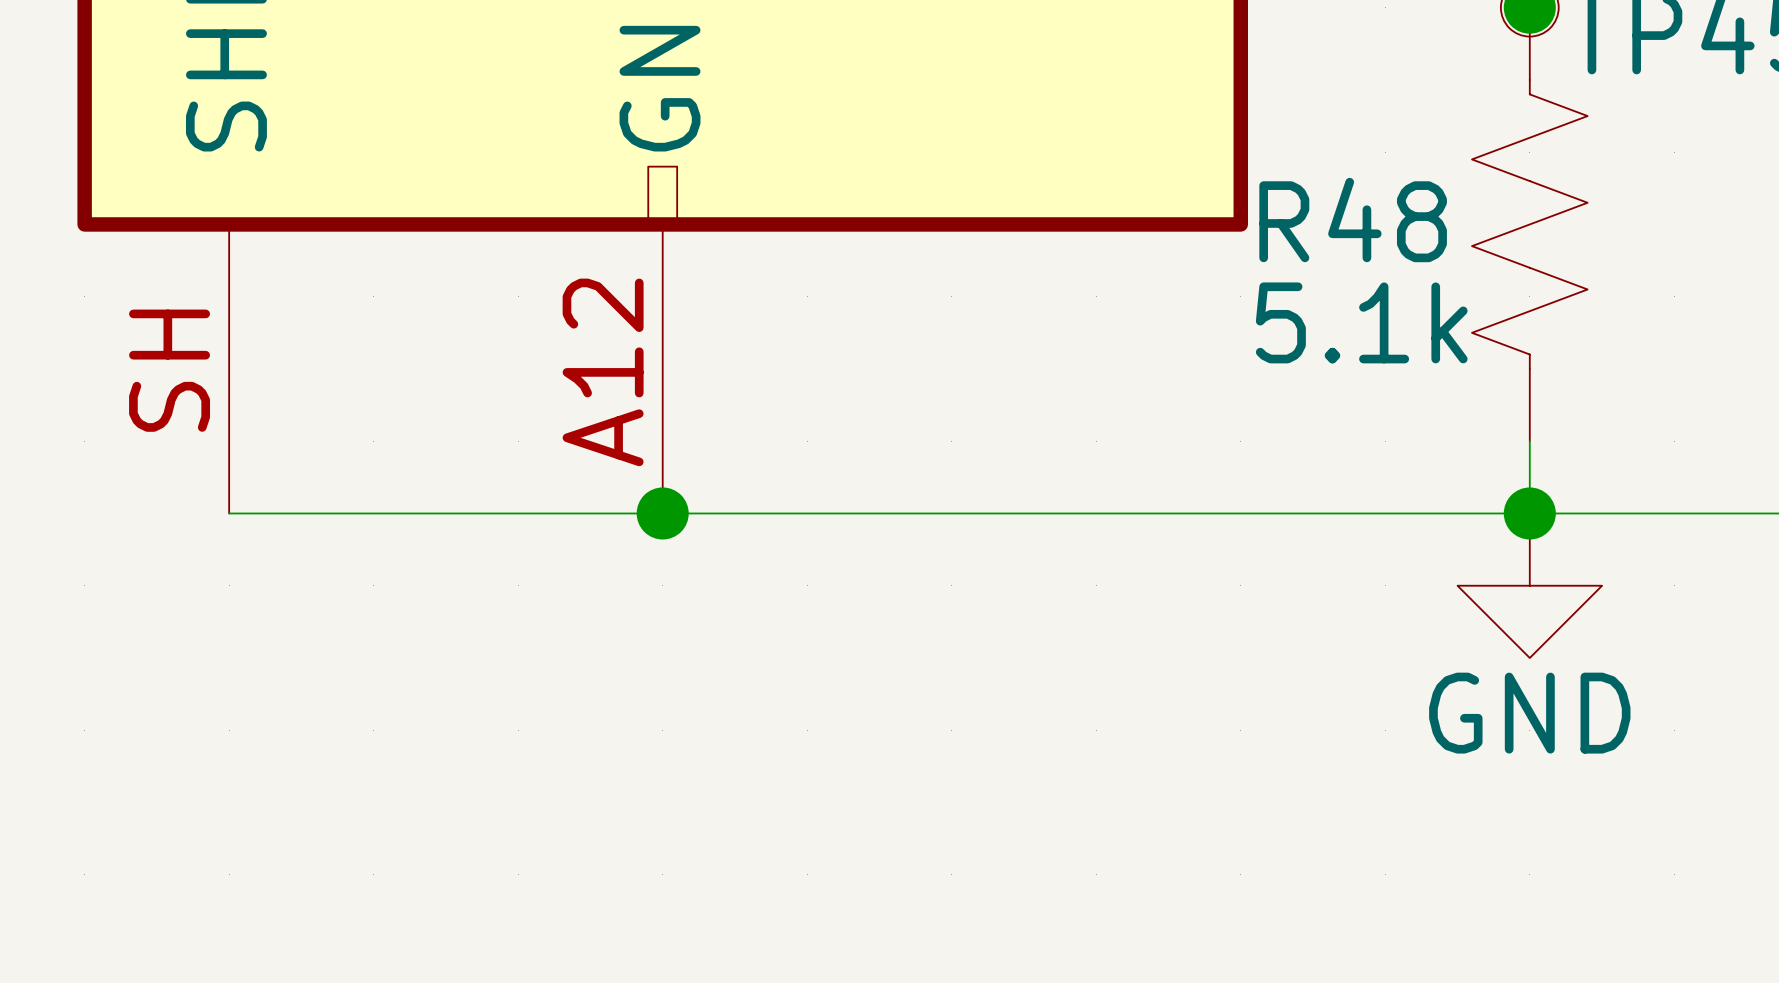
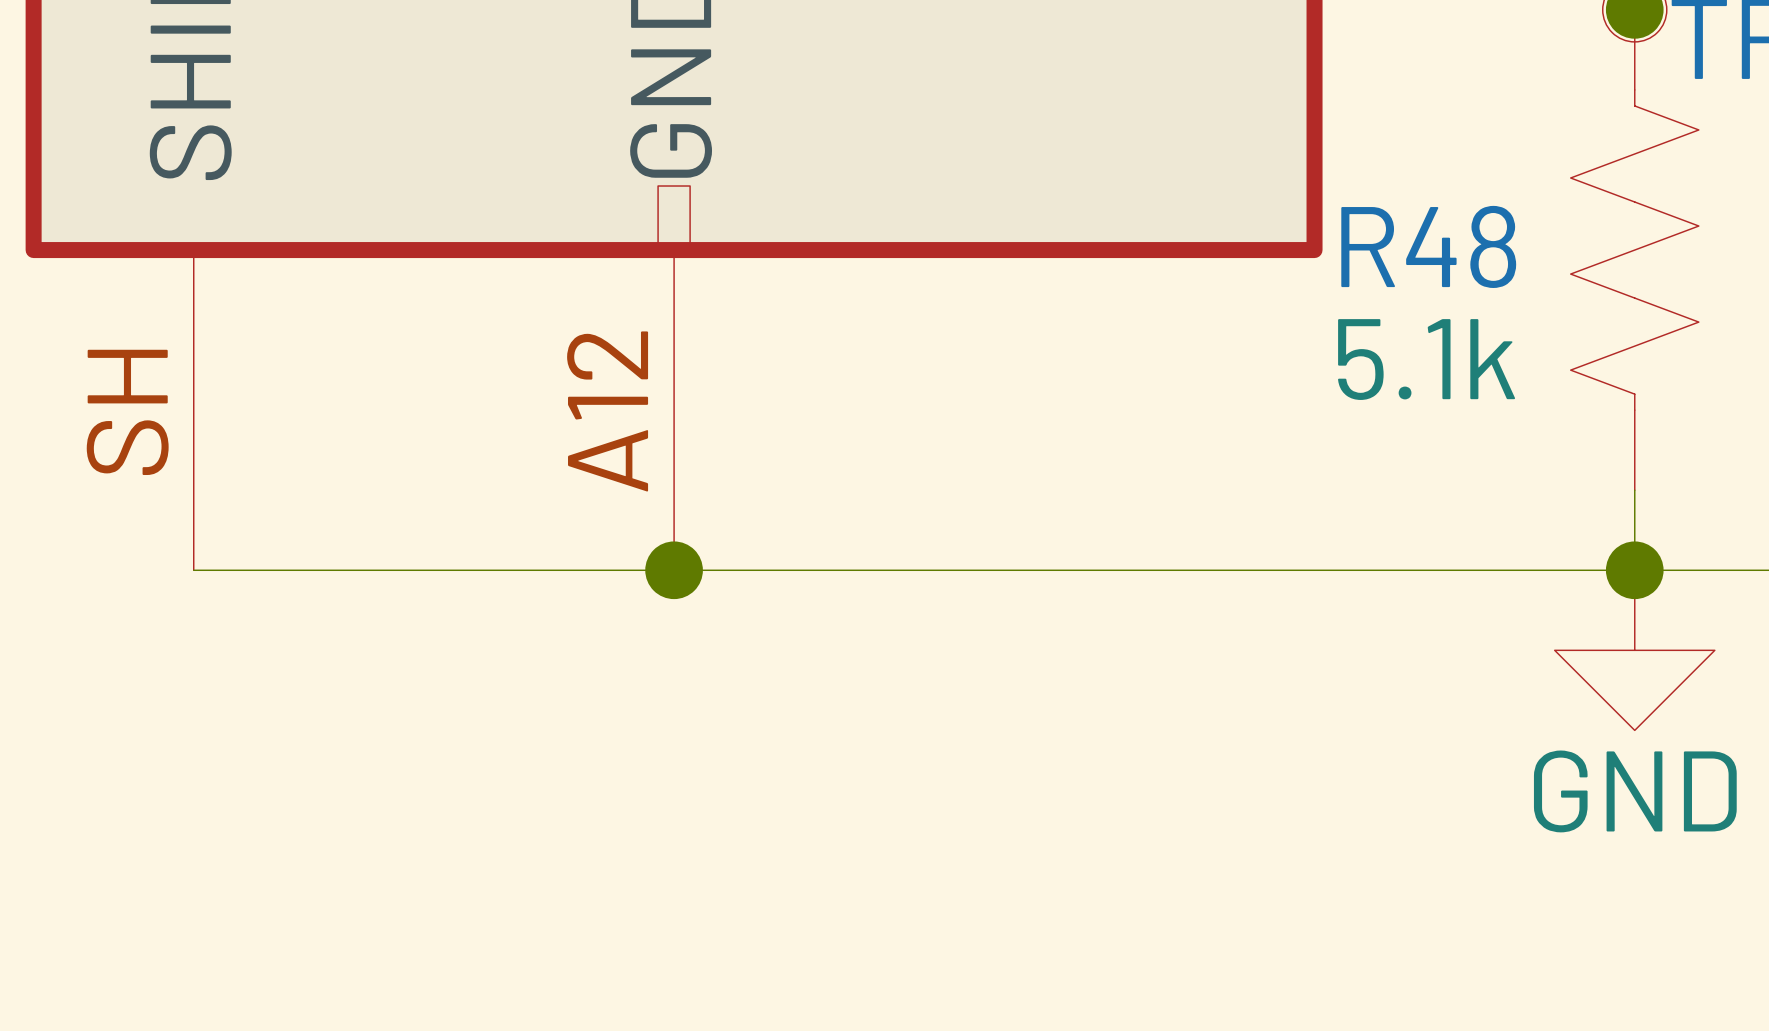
R48 name position: R48 (1353, 220) -> R48 (1428, 246)
R48 value position: 5.1k (1361, 322) -> 5.1k (1426, 359)

